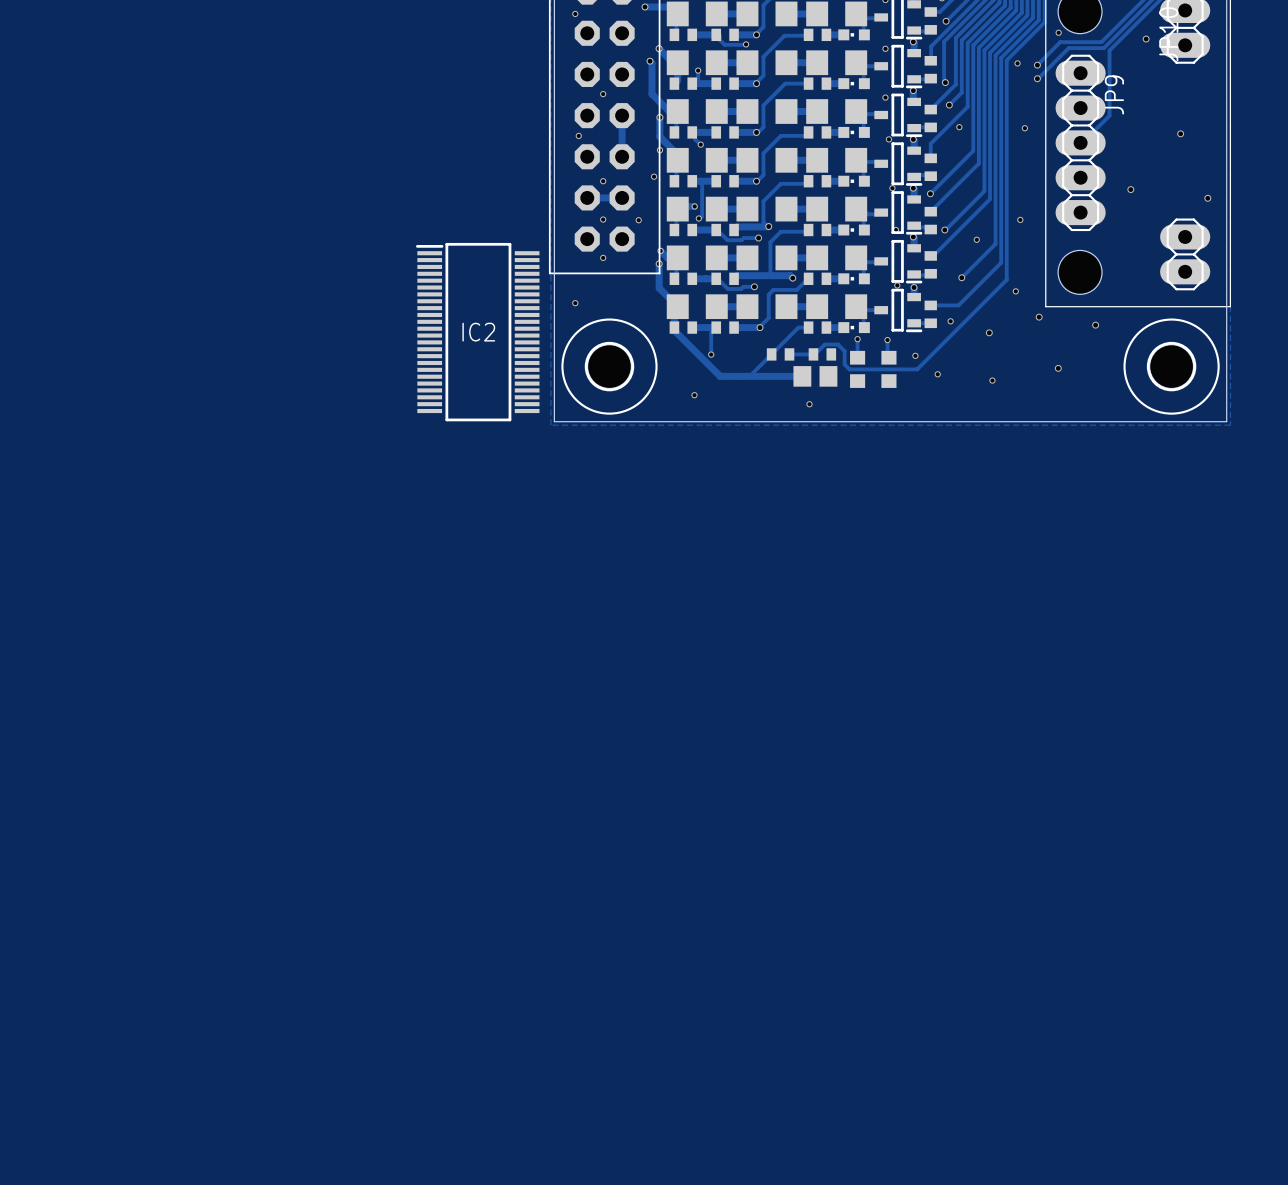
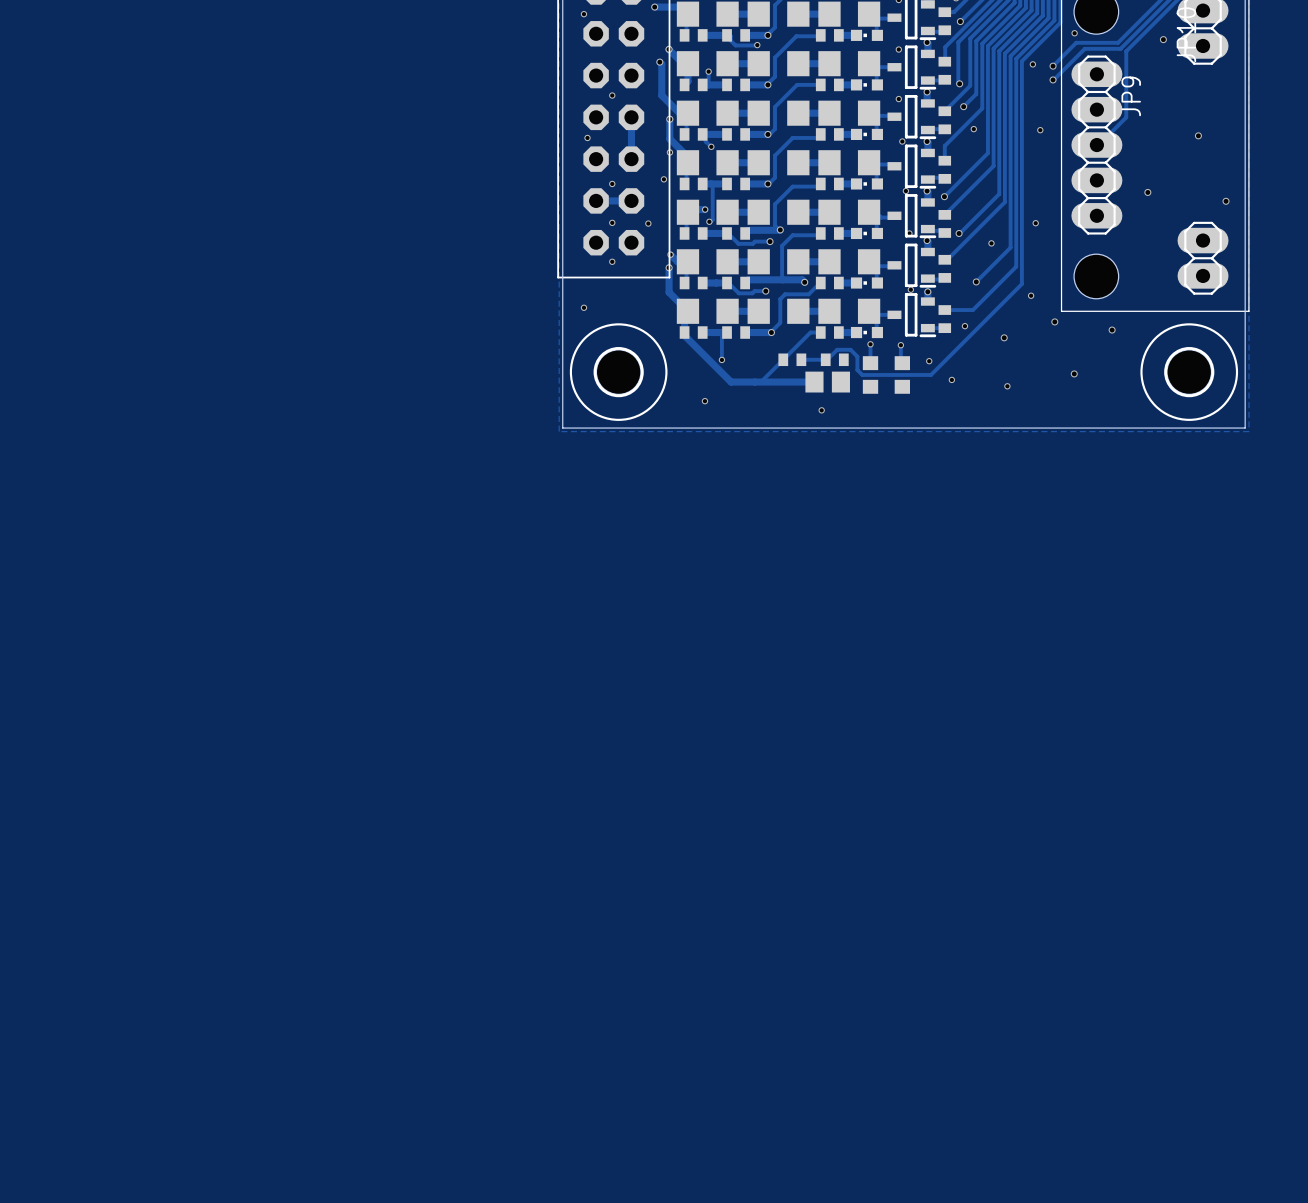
IC2: (477, 332) -> none

